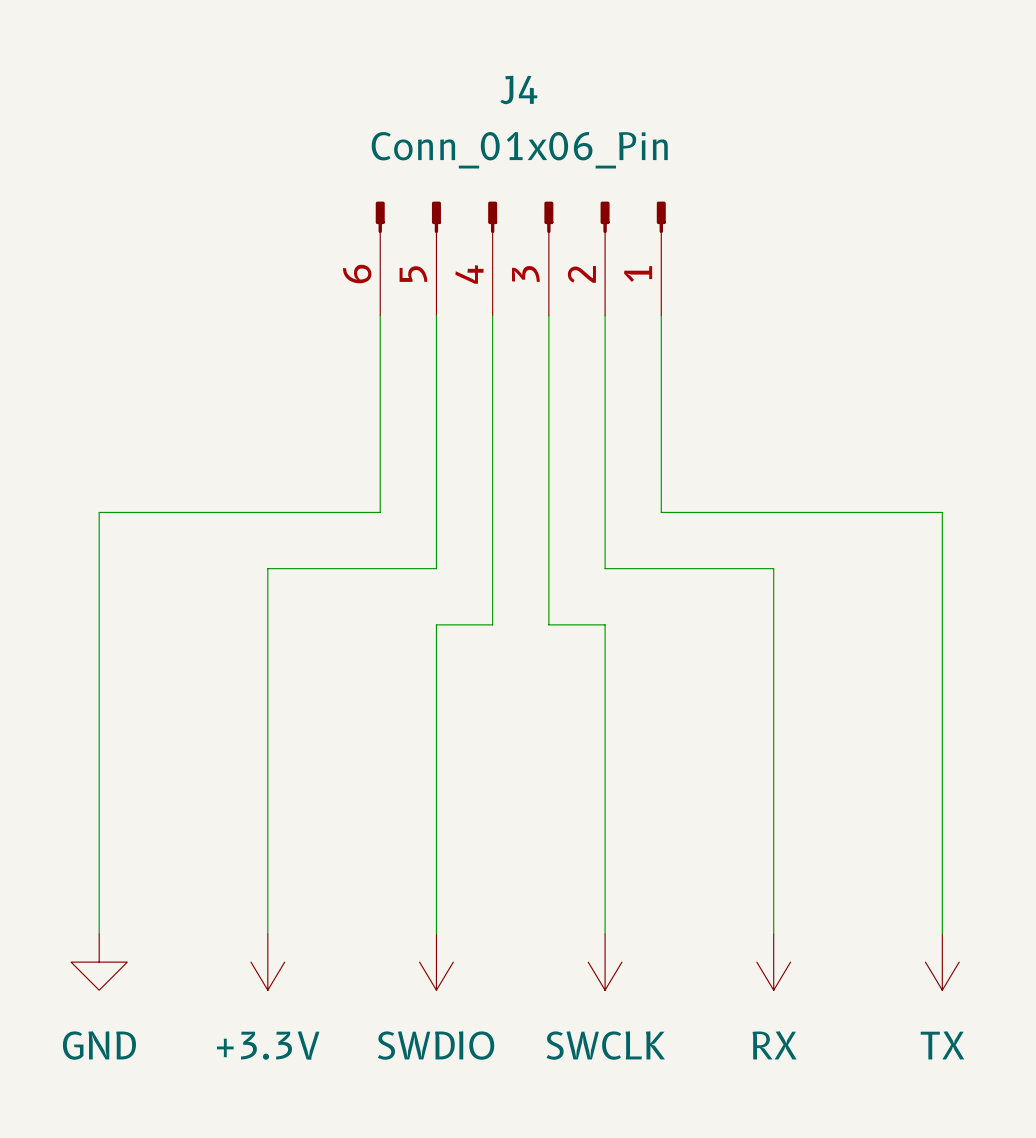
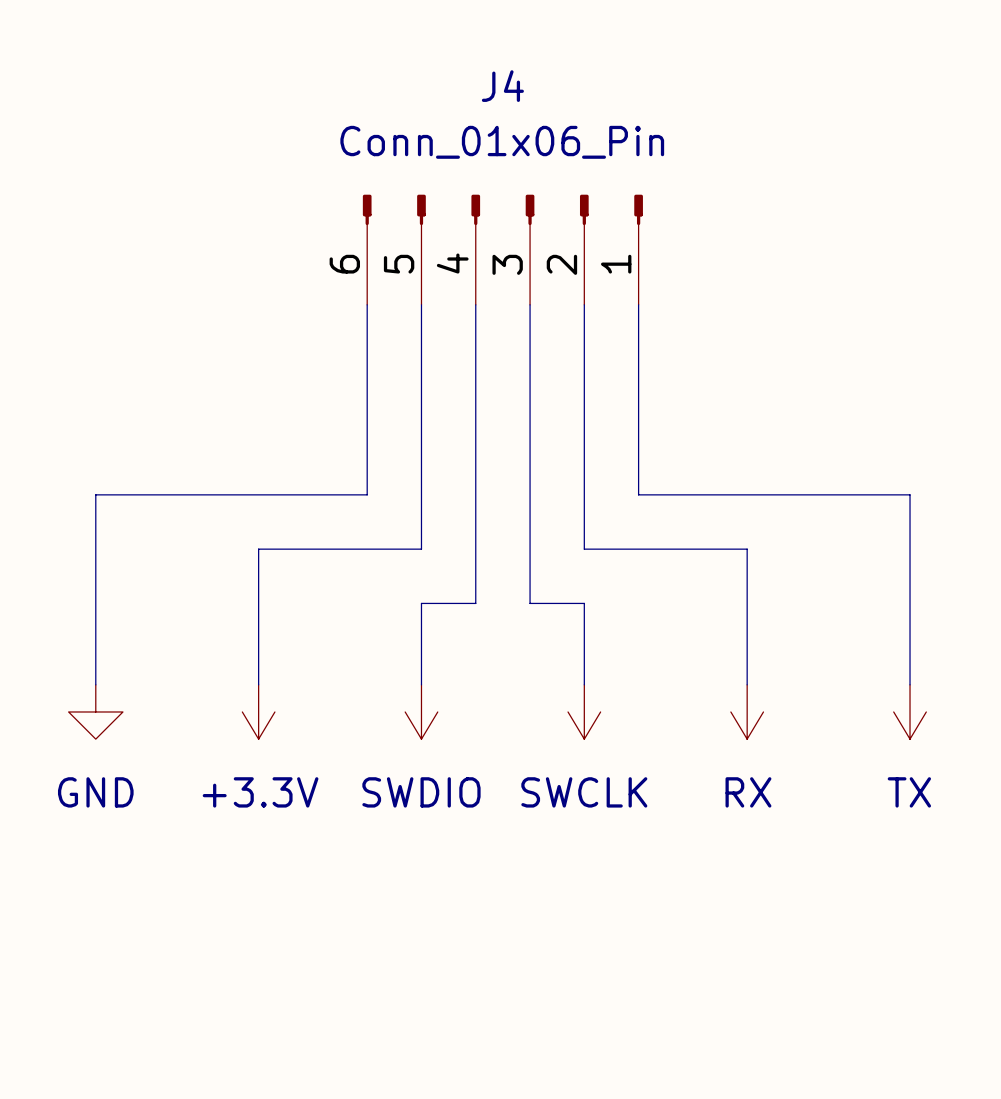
wire: (99, 709) (99, 934) -> none
wire: (267, 709) (267, 934) -> none
wire: (436, 709) (436, 934) -> none
wire: (605, 709) (605, 934) -> none
wire: (773, 709) (773, 934) -> none
wire: (942, 709) (942, 934) -> none
power symbol position: GND (99, 962) -> GND (95, 711)
power symbol position: +3.3V (267, 962) -> +3.3V (258, 711)
power symbol position: SWDIO (436, 962) -> SWDIO (421, 711)
power symbol position: SWCLK (605, 962) -> SWCLK (584, 711)
power symbol position: RX (773, 962) -> RX (747, 711)
power symbol position: TX (942, 962) -> TX (910, 711)

